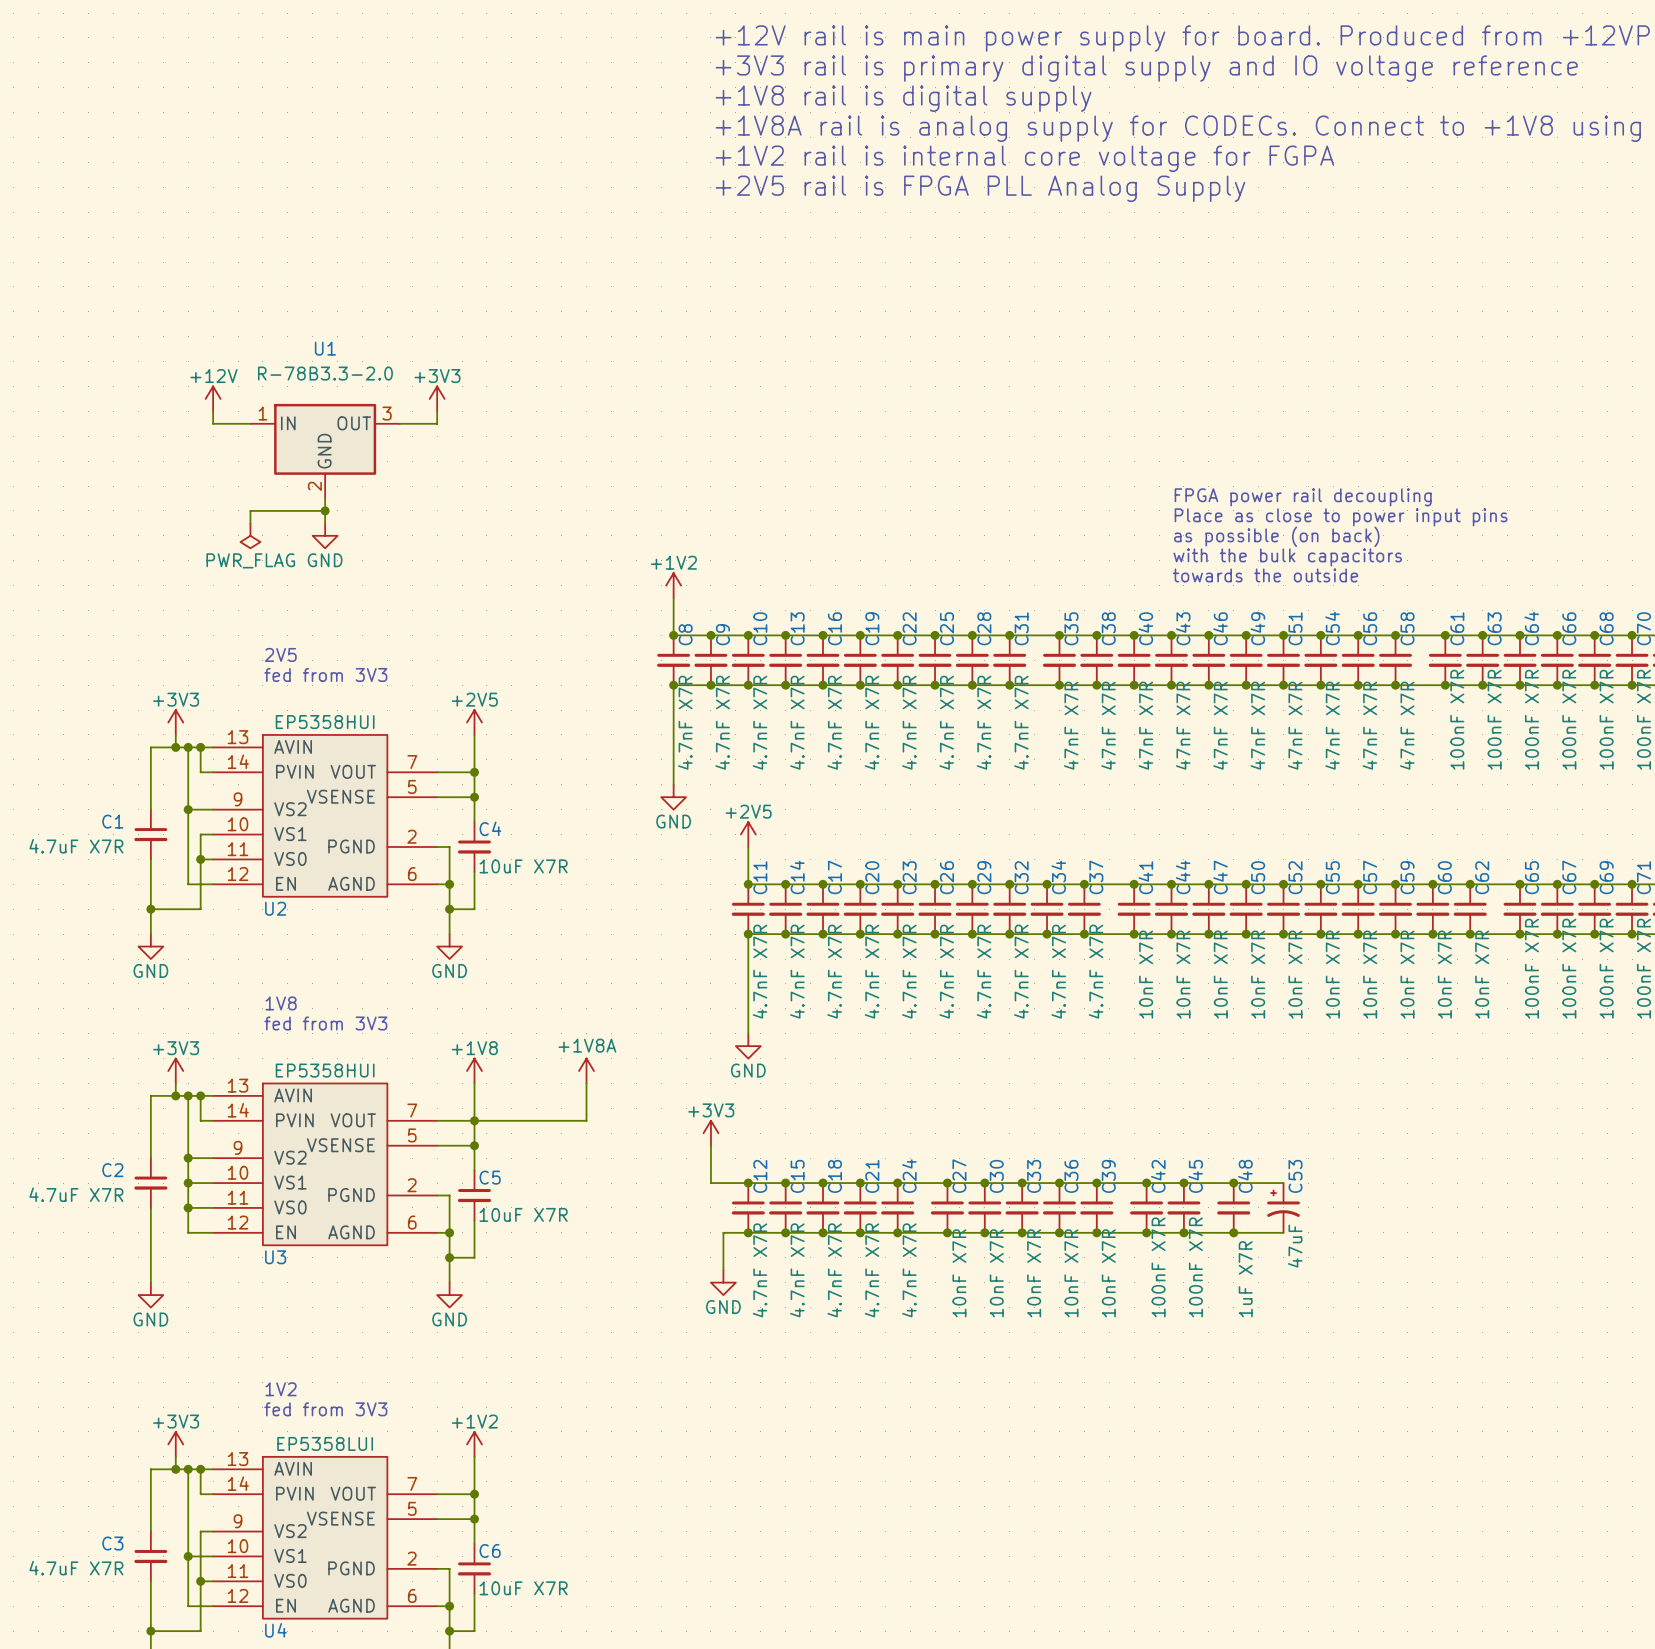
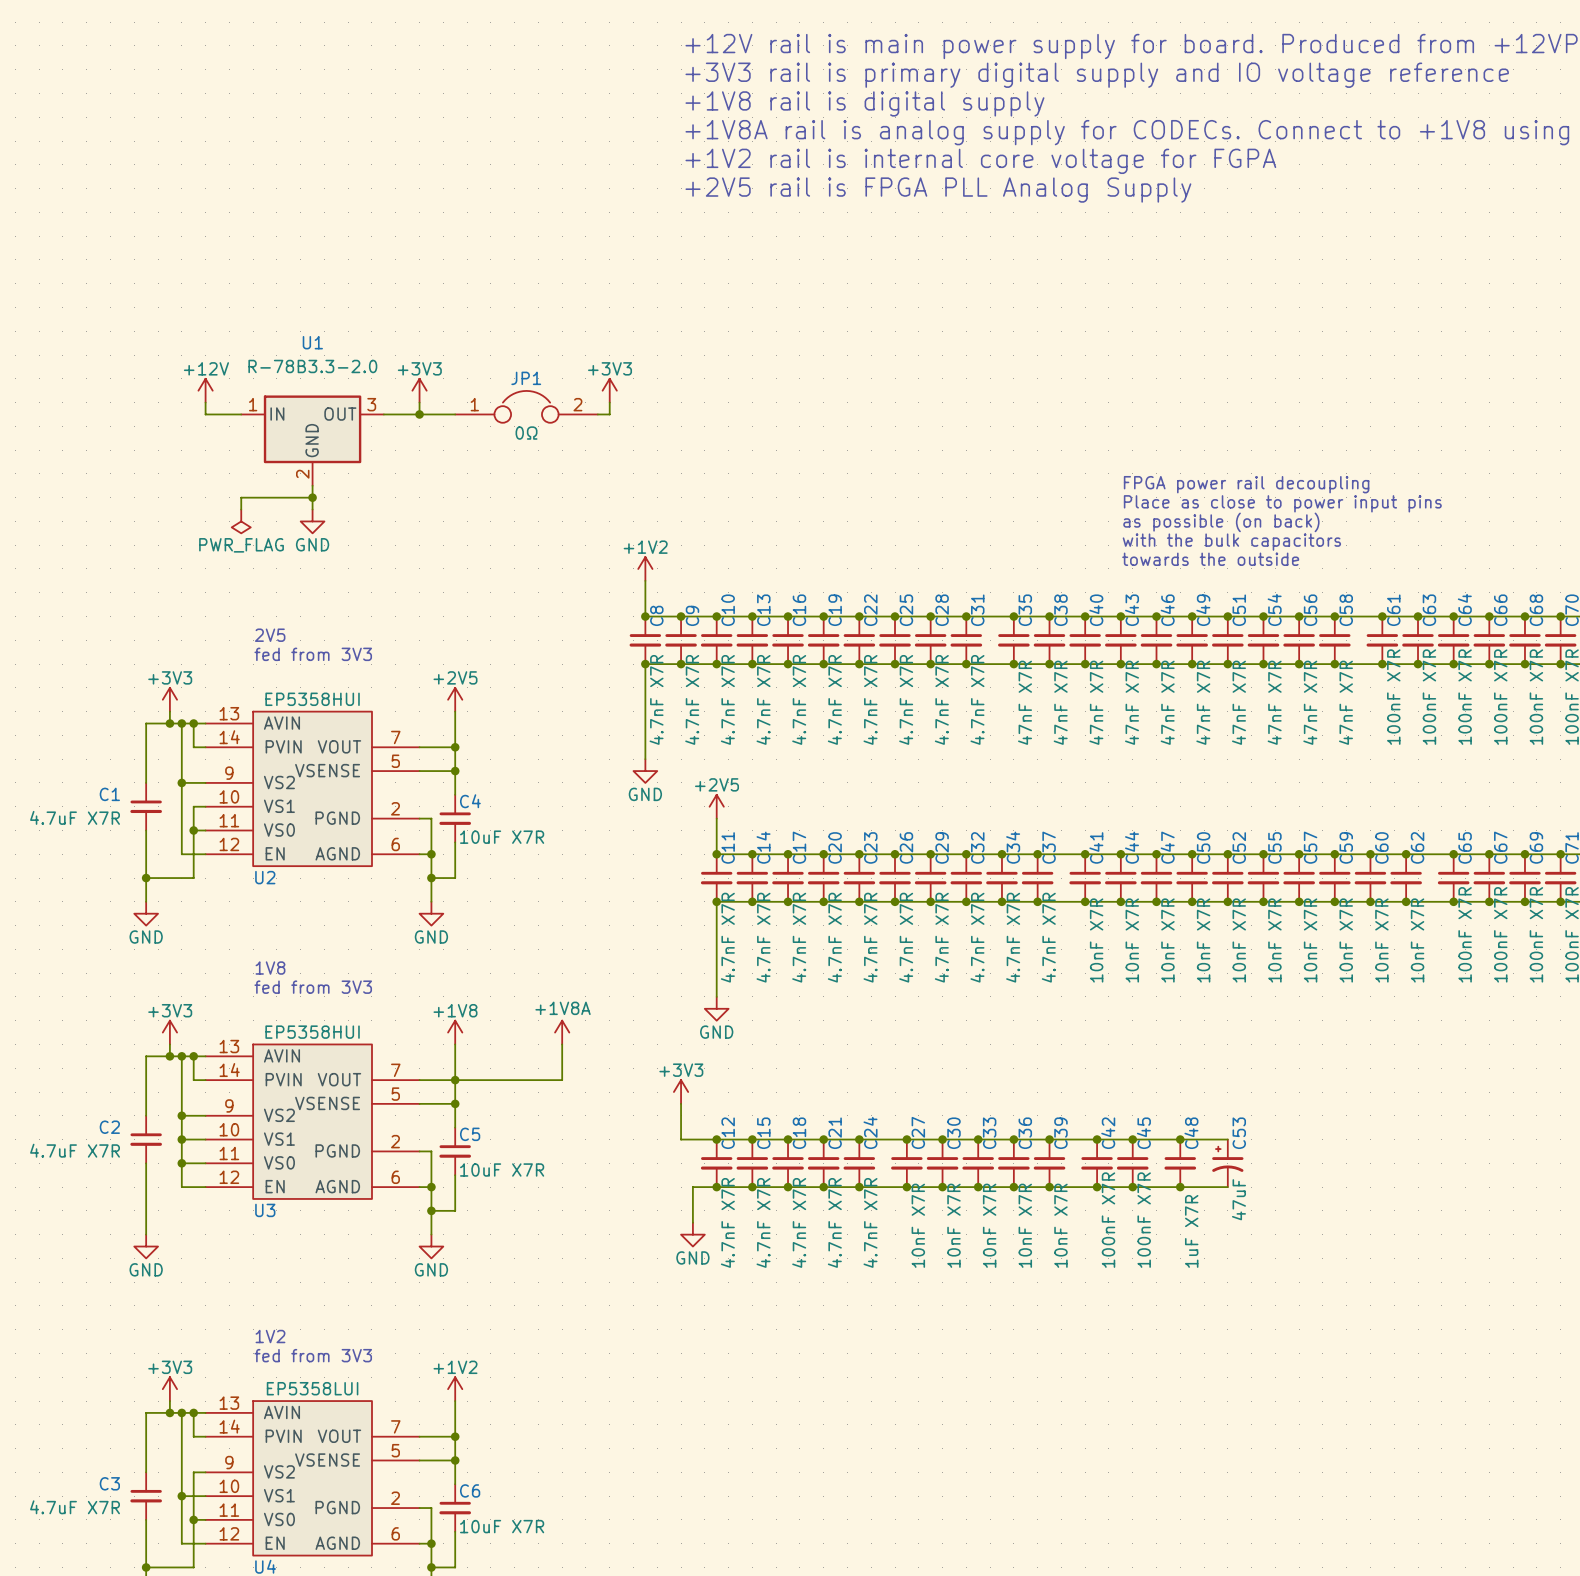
power symbol: none -> +3V3 (609, 390)
wire: none -> (609, 402) (609, 414) (597, 414)
JP1: none -> 0Ω (526, 406)
wire: none -> (419, 414) (455, 414)
junction: none -> (419, 414)

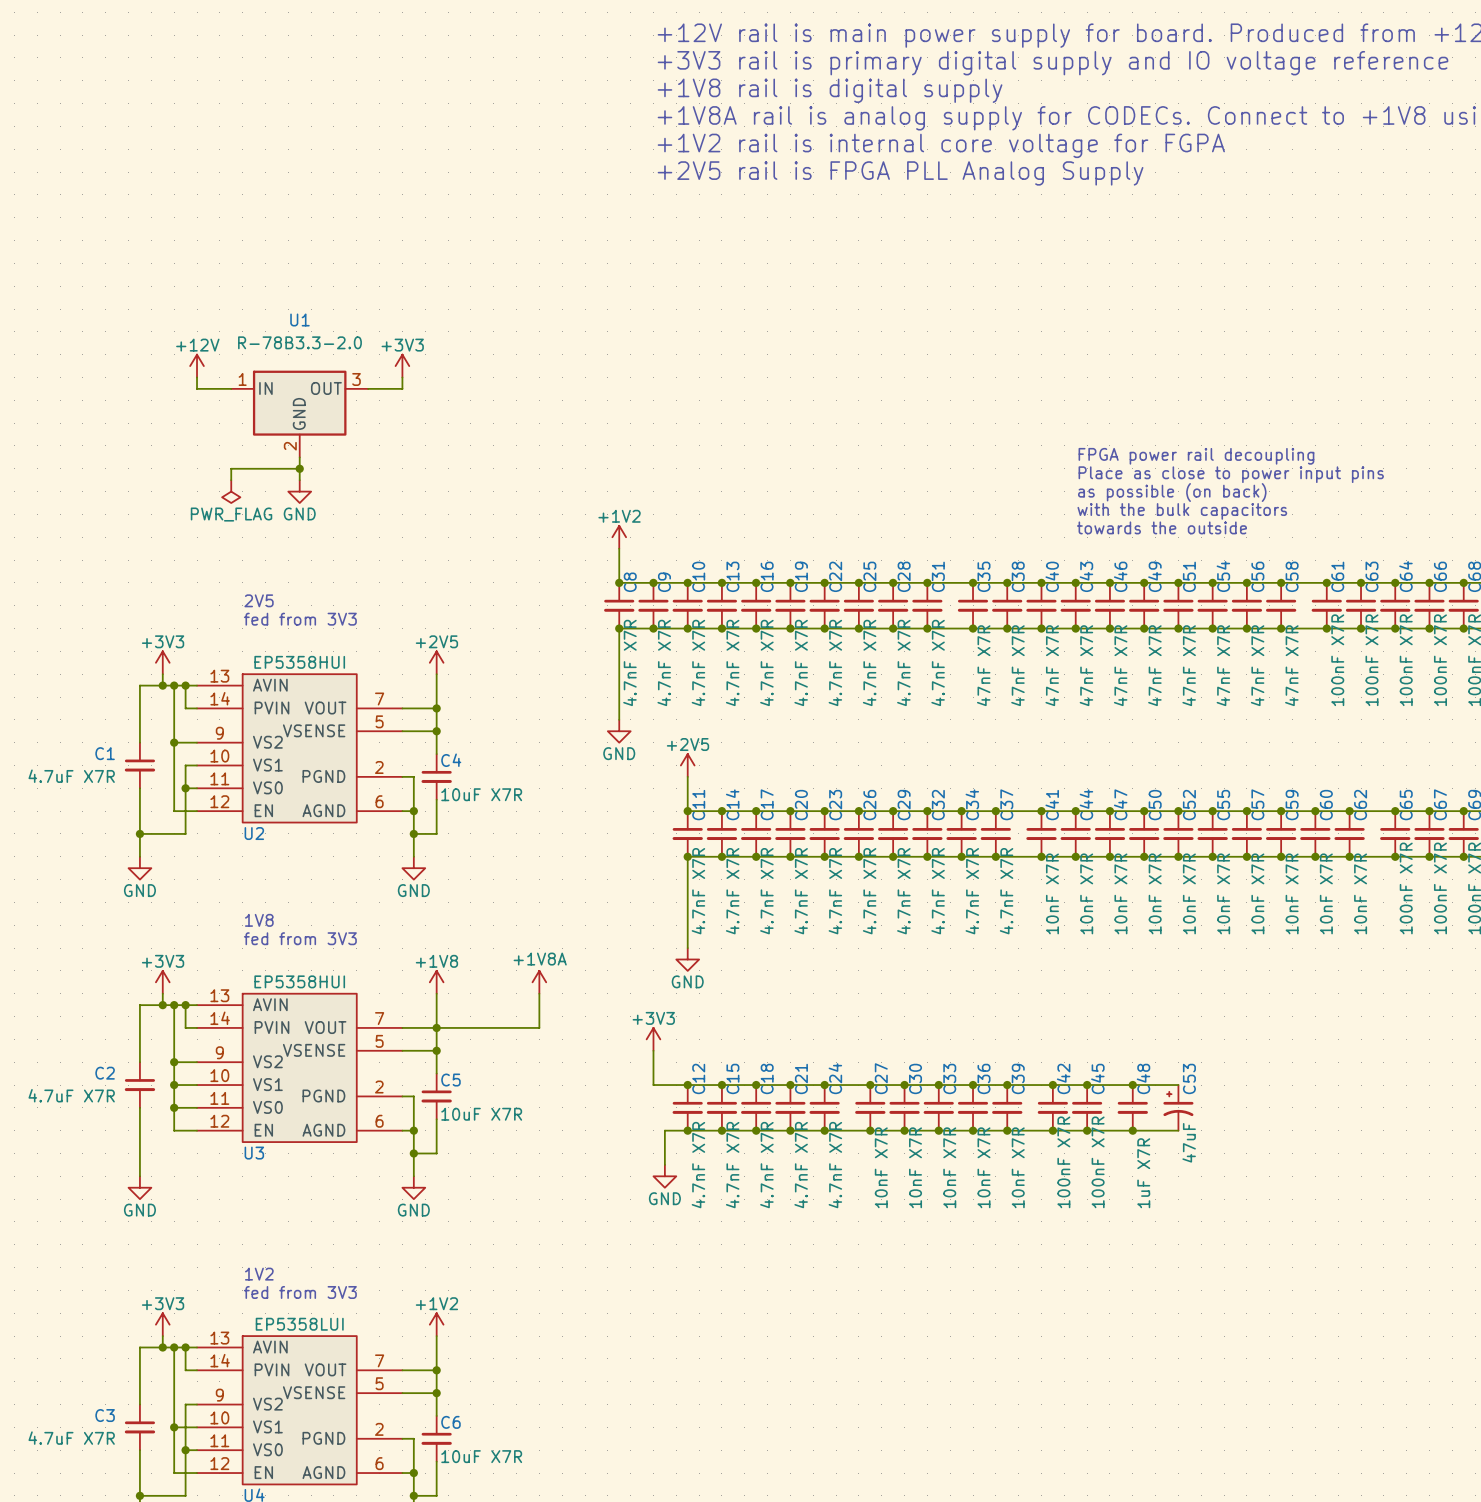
power symbol: +3V3 (609, 390) -> none
wire: (609, 402) (609, 414) (597, 414) -> none
JP1: 0Ω (526, 406) -> none
wire: (419, 414) (455, 414) -> none
junction: (419, 414) -> none

